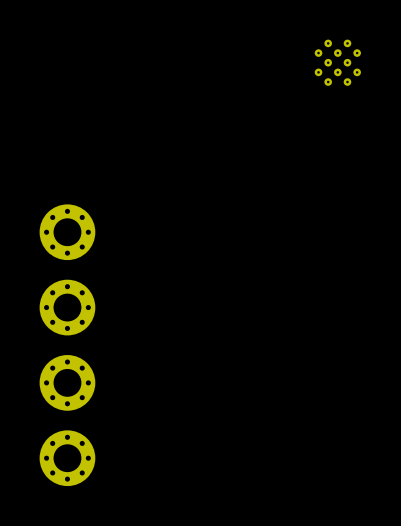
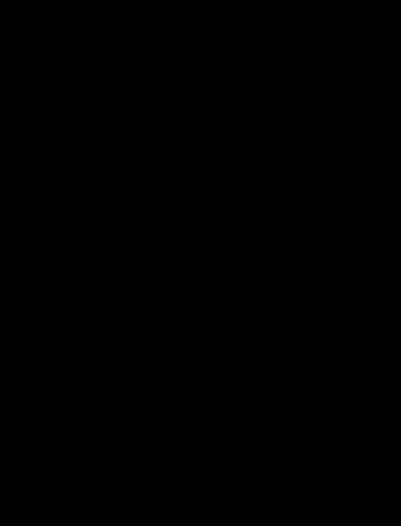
part: (337, 62) -> none
part: (67, 232) -> none
part: (67, 307) -> none
part: (67, 382) -> none
part: (67, 458) -> none

